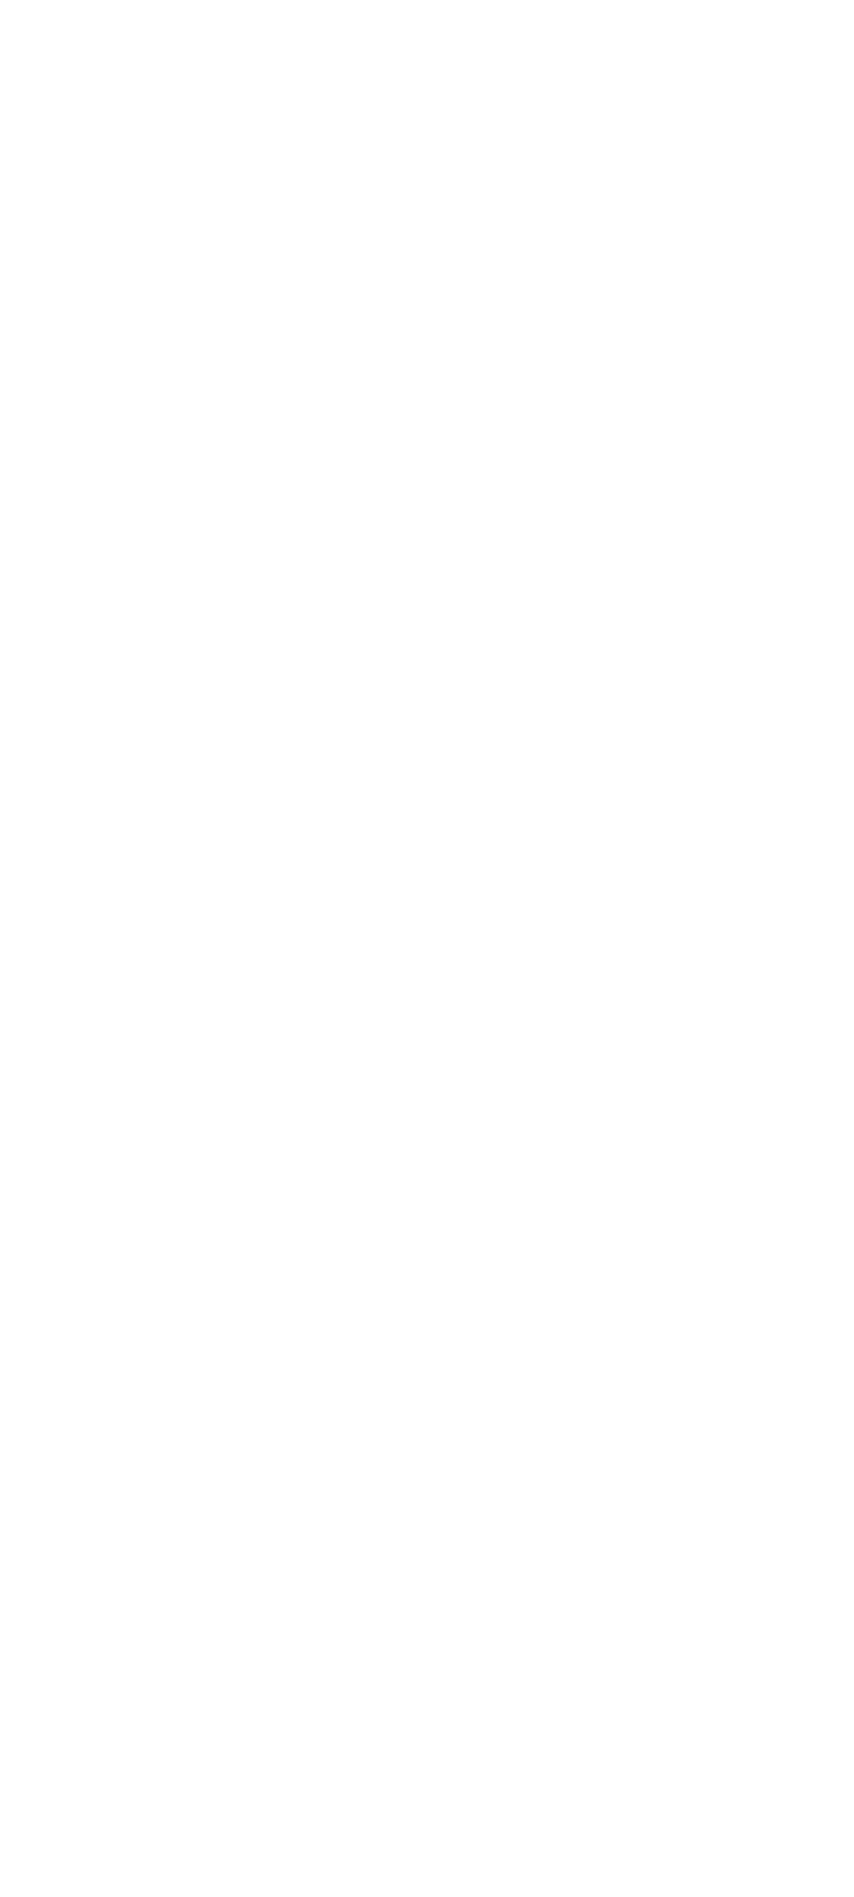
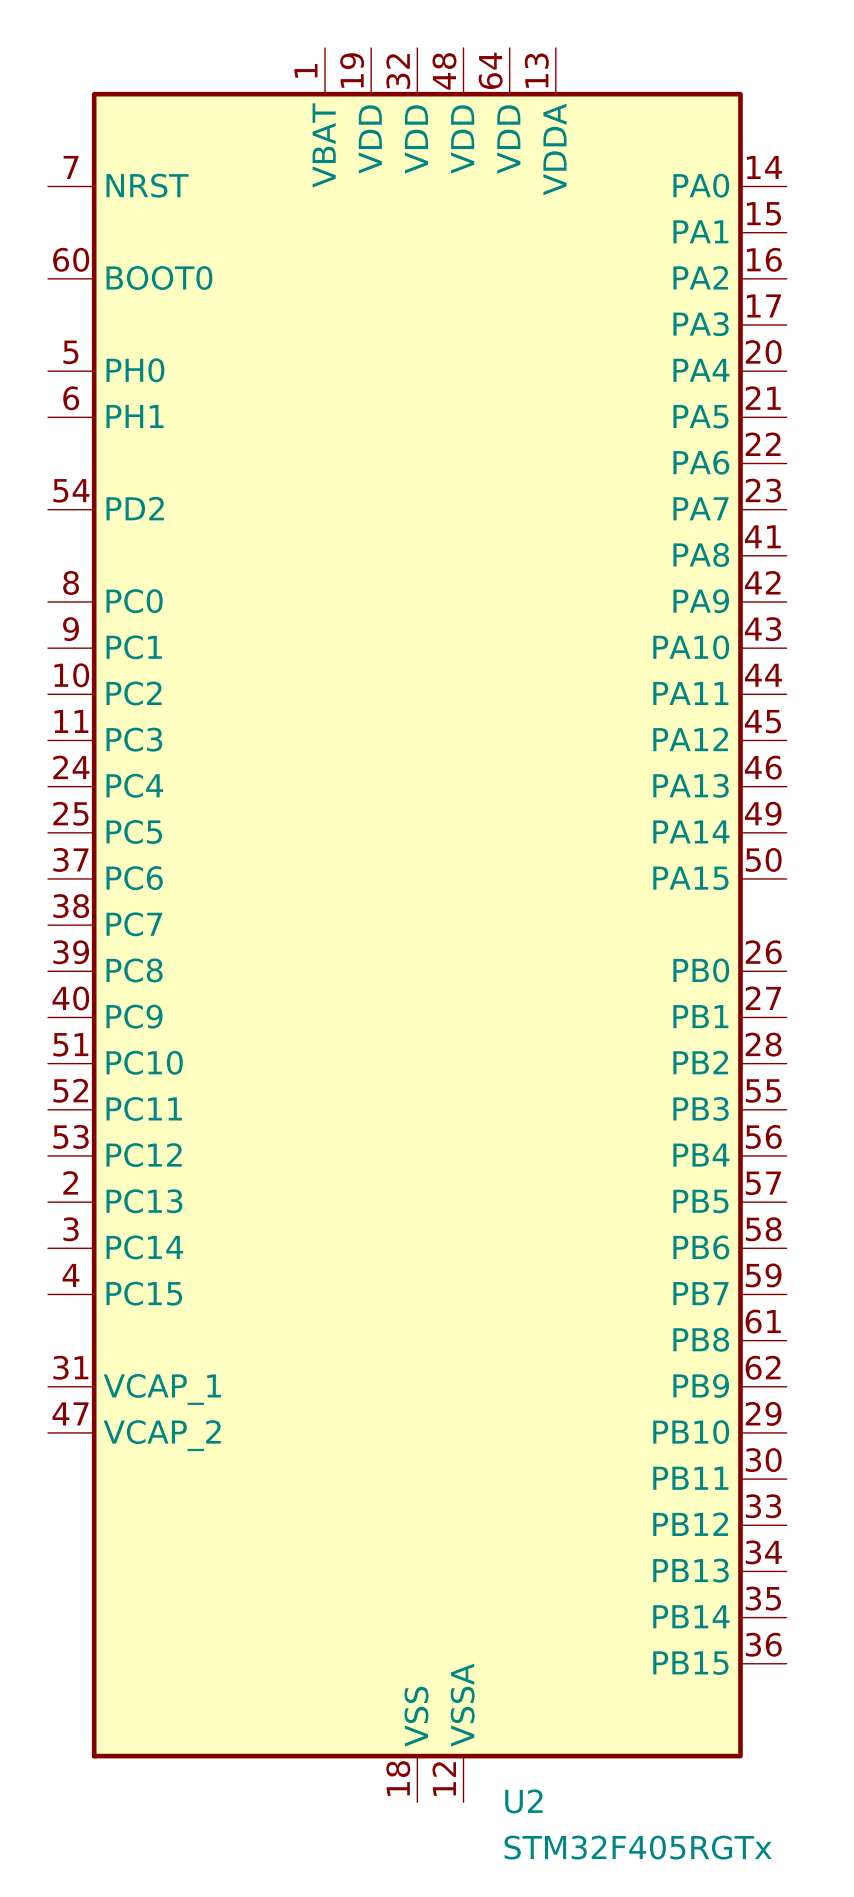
U2: none -> STM32F405RGTx (417, 925)

